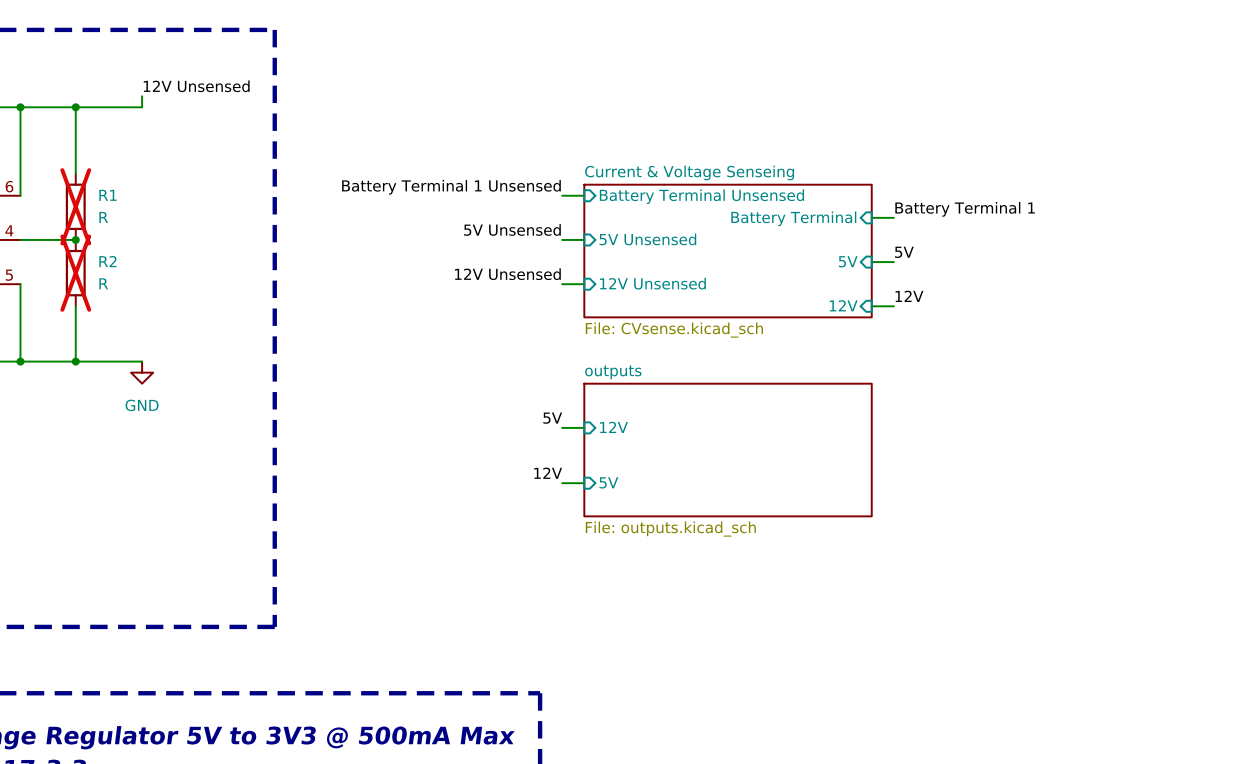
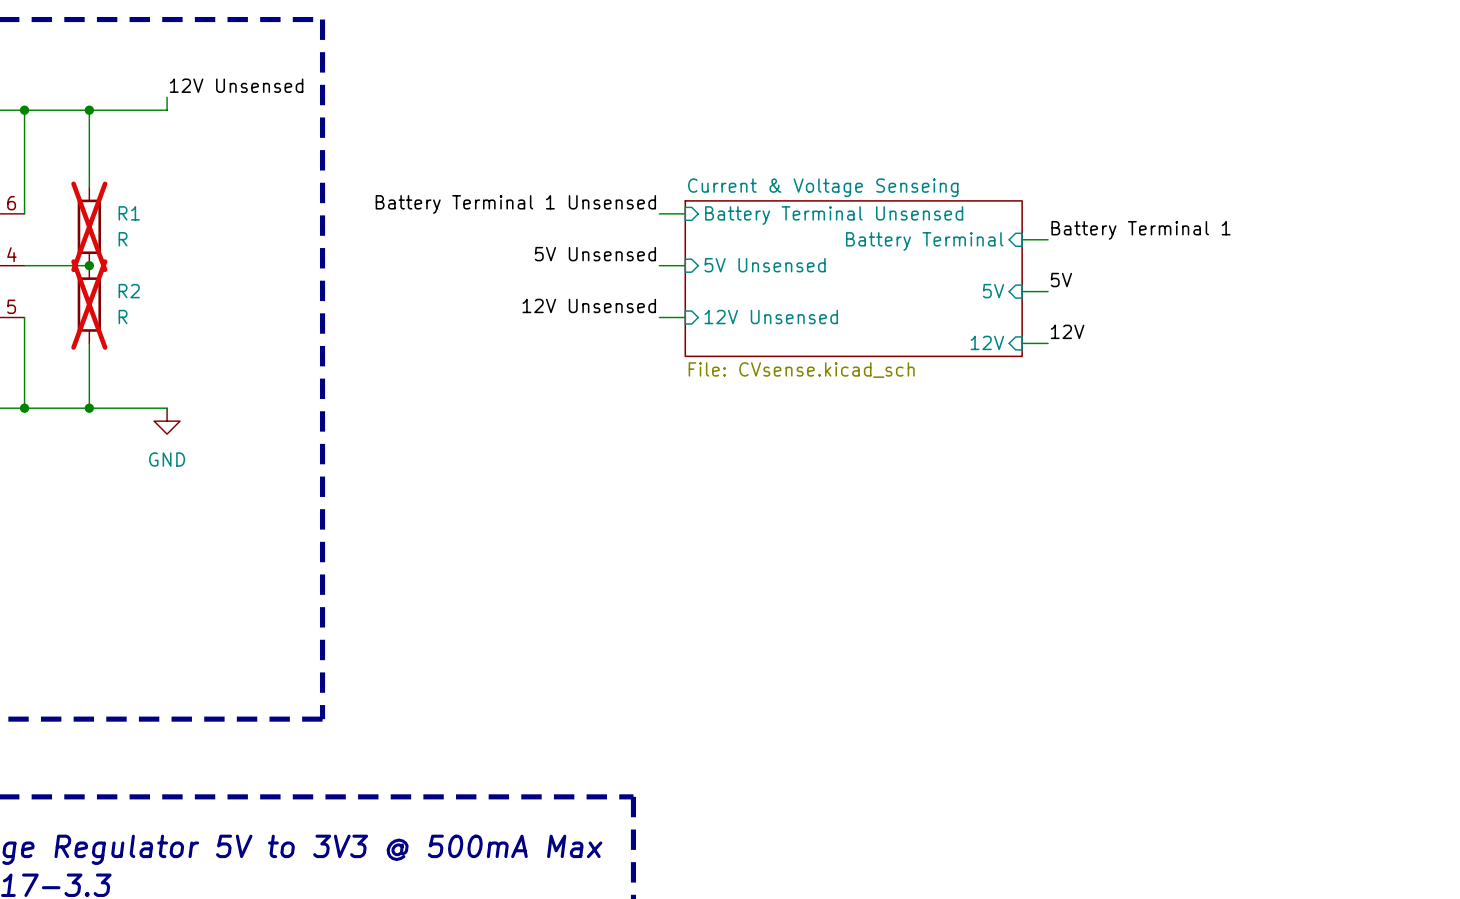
label: 5V (552, 418) -> none
wire: (562, 427) (584, 427) -> none
sheet pin: 12V (613, 427) -> none
sheet outputs: File: outputs.kicad_sch (728, 450) -> none
label: 12V (548, 473) -> none
sheet pin: 5V (608, 482) -> none
wire: (562, 483) (584, 483) -> none

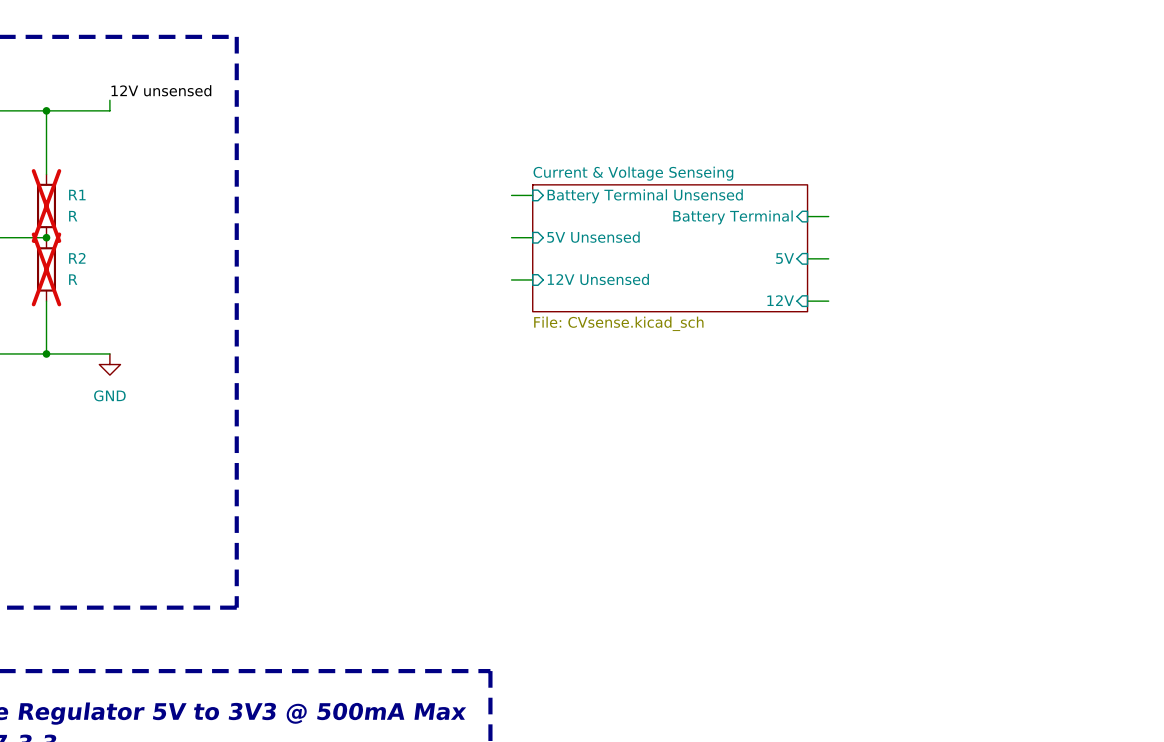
label: 12V Unsensed (236, 85) -> 12V unsensed (161, 90)
label: Battery Terminal 1 Unsensed (515, 204) -> none
label: Battery Terminal 1 (1140, 230) -> none
label: 5V Unsensed (595, 254) -> none
label: 5V (1061, 280) -> none
label: 12V Unsensed (589, 305) -> none
label: 12V (1067, 331) -> none

